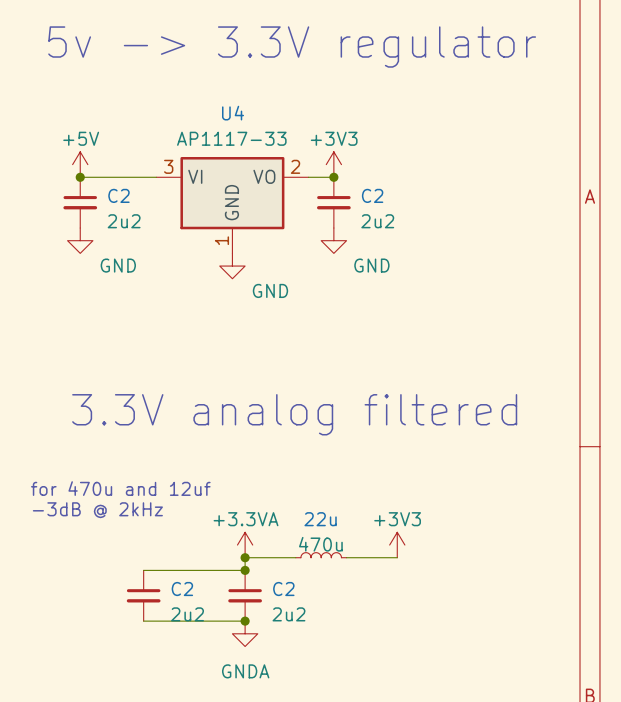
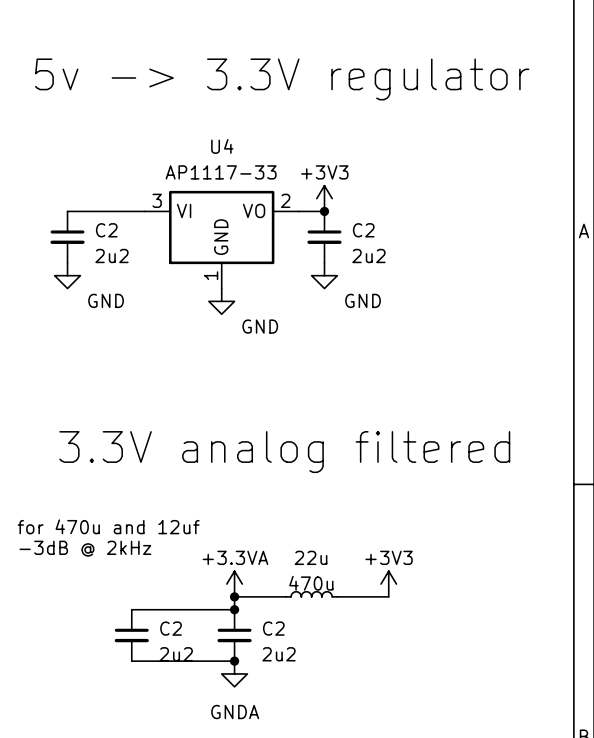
power symbol: +5V (80, 164) -> none
junction: (80, 177) -> none

